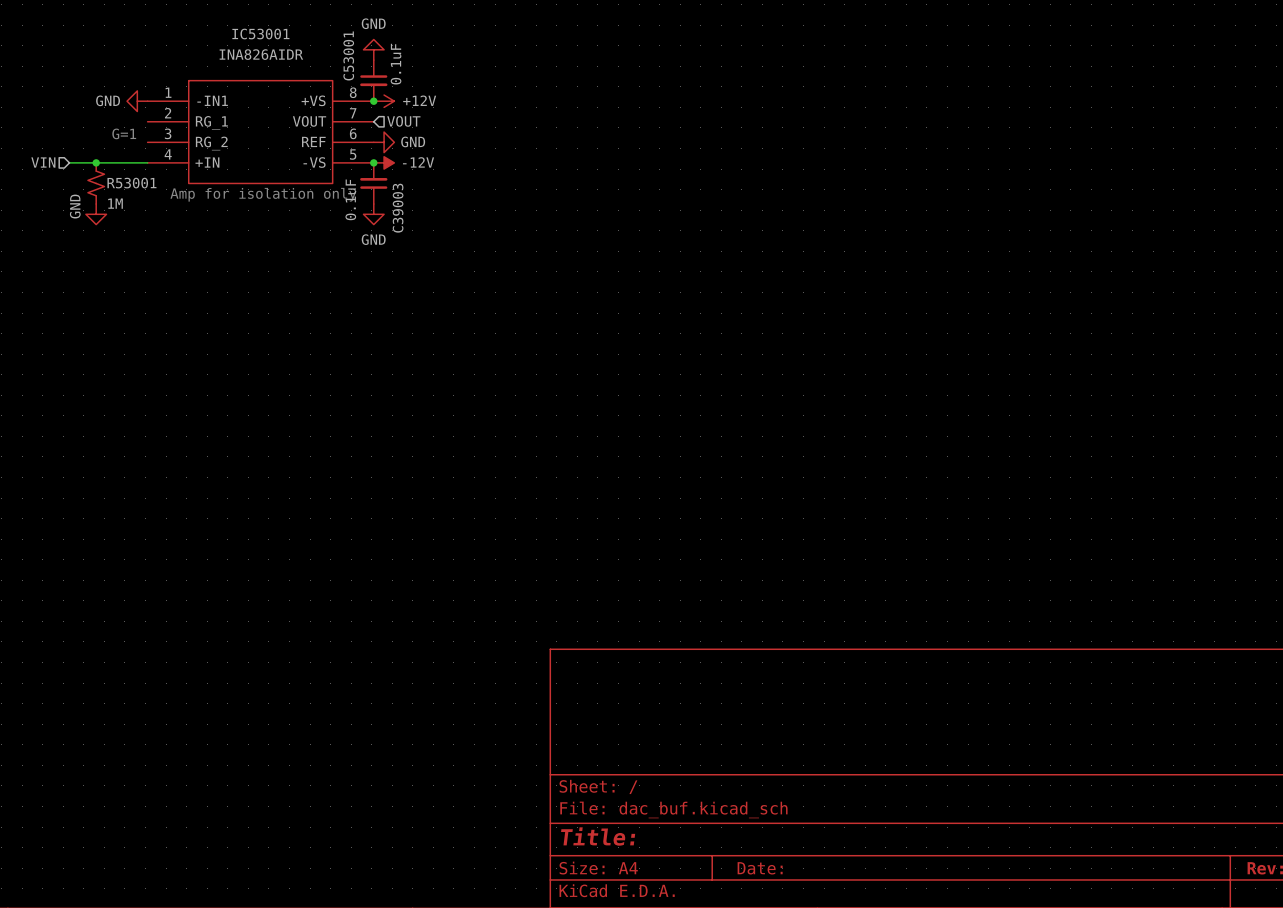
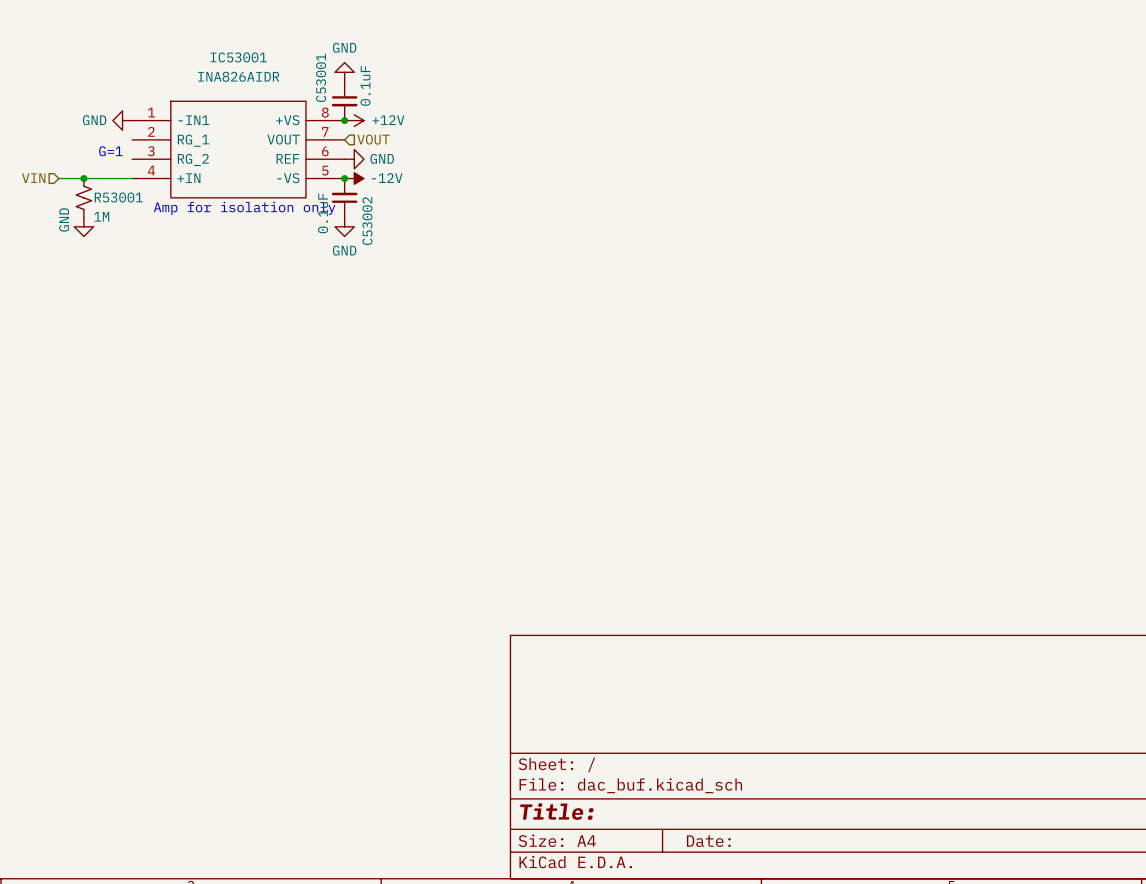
C39003 name: C39003 (398, 208) -> C53002 (367, 220)

